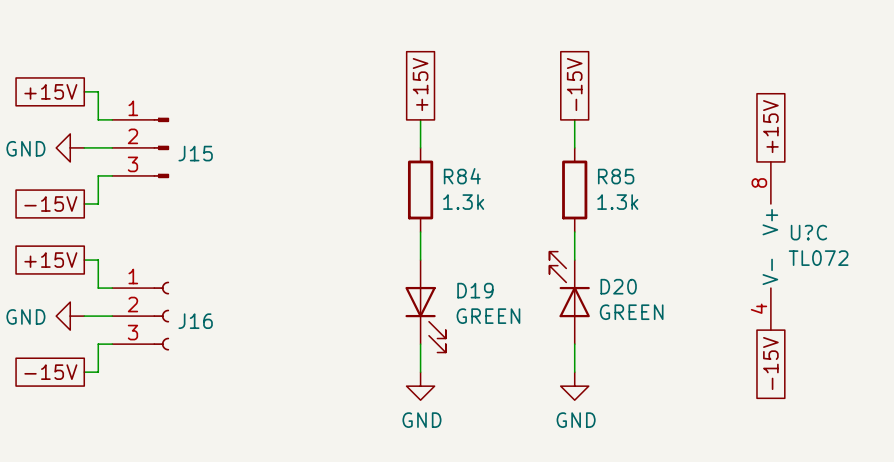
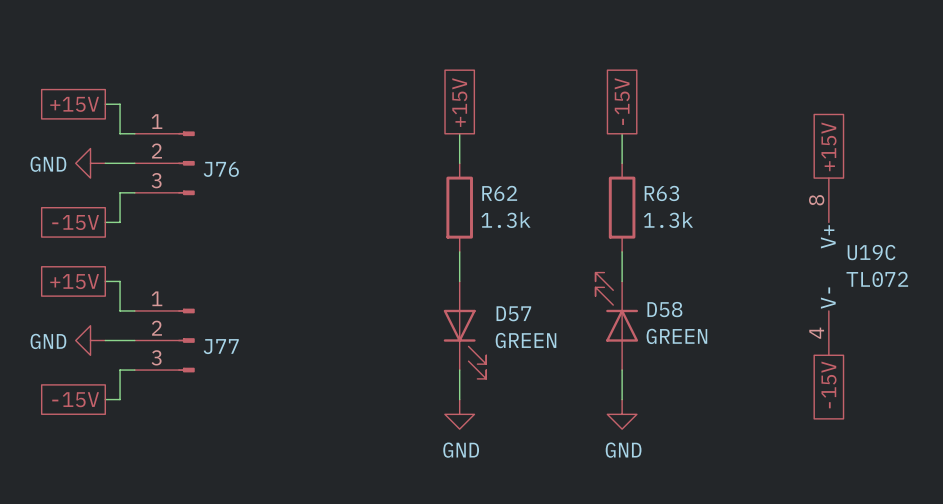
J15 name: J15 (195, 153) -> J76 (221, 169)
R84 name: R84 (462, 176) -> R62 (499, 193)
R85 name: R85 (616, 176) -> R63 (661, 193)
U?C name: U?C (808, 232) -> U19C (871, 252)
D20 name: D20 (618, 286) -> D58 (664, 309)
D19 name: D19 (475, 290) -> D57 (513, 313)
J16: (140, 316) -> none
J77: none -> (164, 340)

